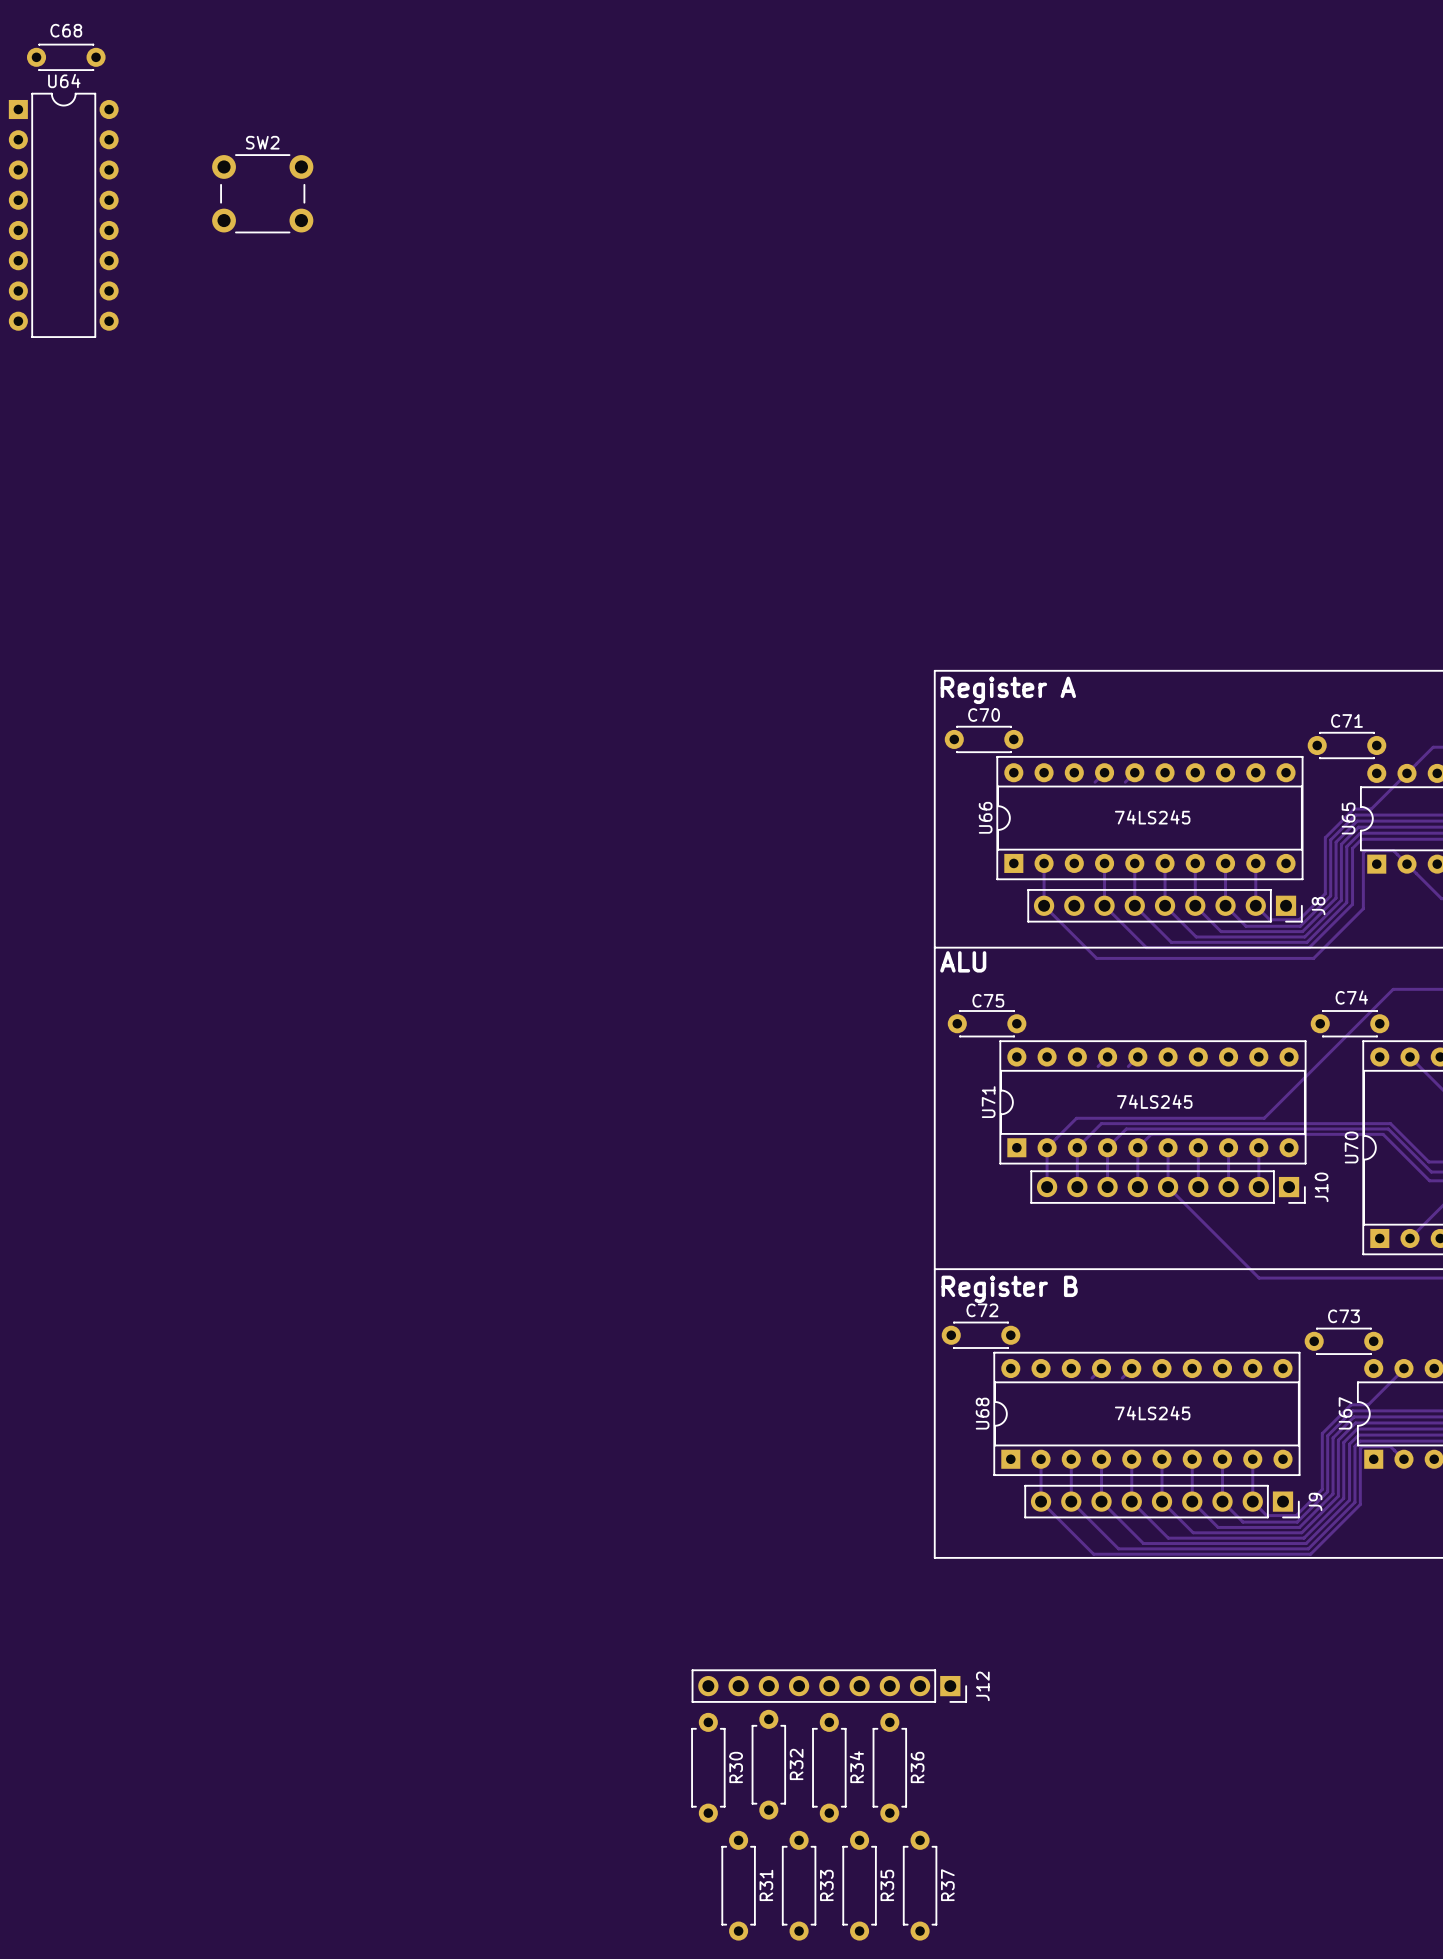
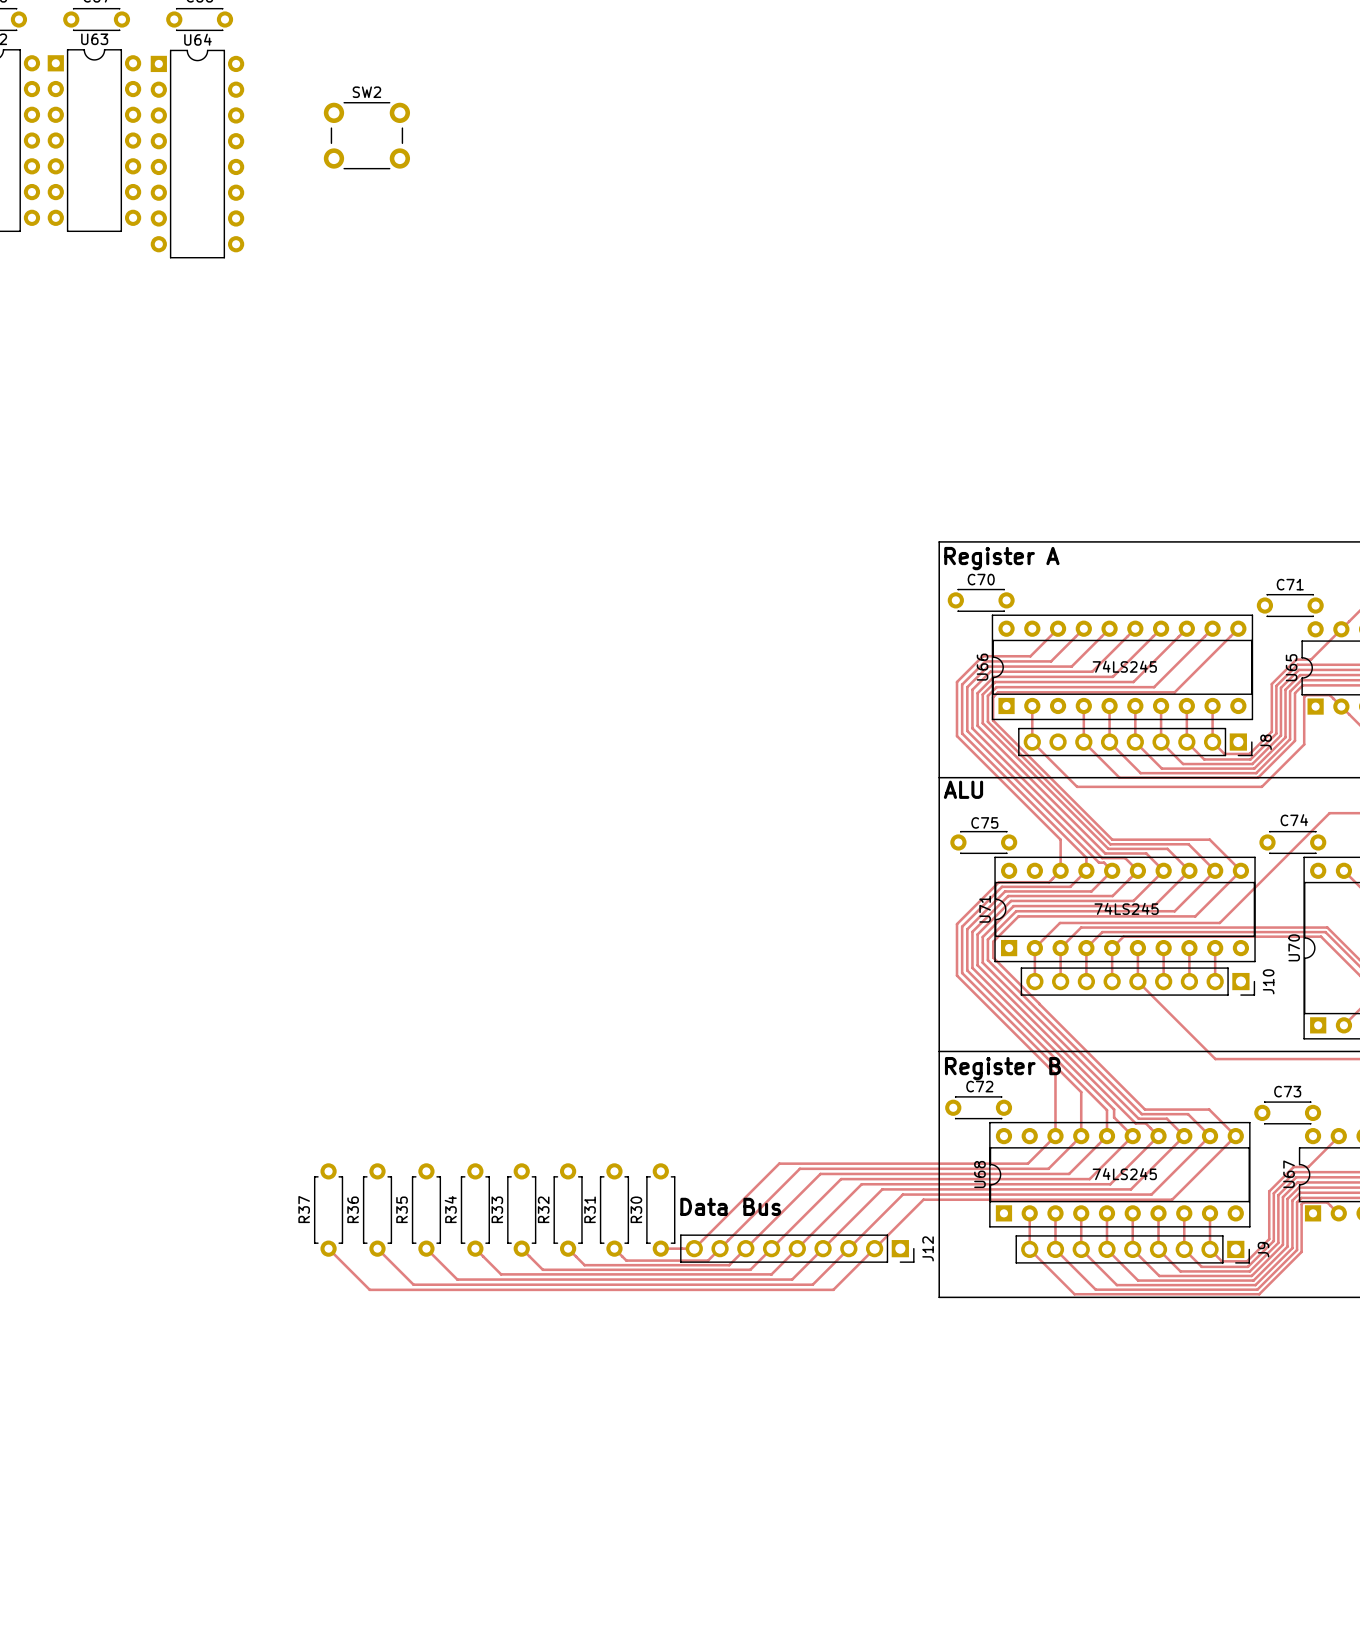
track: none -> (1058, 628) (1030, 656) (982, 656) (957, 682) (957, 736) (1060, 839) (1060, 870) (1049, 882) (998, 882) (957, 924) (957, 975) (1055, 1074) (1055, 1136) (1027, 1163) (779, 1163) (694, 1248) (660, 1248)
track: none -> (1135, 628) (1092, 671) (990, 671) (972, 689) (972, 728) (1102, 858) (1125, 858) (1137, 870) (1112, 896) (1008, 896) (972, 931) (972, 967) (1114, 1109) (1114, 1117) (1132, 1136) (1089, 1179) (841, 1179) (750, 1269) (542, 1269) (521, 1248)
track: none -> (1161, 628) (1112, 676) (993, 676) (977, 693) (977, 725) (1105, 853) (1146, 853) (1163, 870) (1133, 900) (1011, 900) (977, 934) (977, 965) (1135, 1123) (1145, 1123) (1158, 1136) (1110, 1184) (861, 1184) (771, 1274) (501, 1274) (475, 1248)
track: none -> (1186, 628) (1133, 682) (995, 682) (982, 694) (982, 723) (1108, 848) (1167, 848) (1189, 870) (1154, 906) (1013, 906) (982, 937) (982, 962) (1138, 1118) (1166, 1118) (1184, 1136) (1130, 1189) (882, 1189) (823, 1248)
track: none -> (1212, 628) (1154, 687) (996, 687) (987, 695) (987, 721) (1110, 844) (1188, 844) (1215, 870) (1174, 911) (1016, 911) (987, 939) (987, 960) (1141, 1114) (1188, 1114) (1210, 1136) (1151, 1194) (902, 1194) (812, 1284) (413, 1284) (377, 1248)
track: none -> (1238, 628) (1174, 692) (998, 692) (993, 697) (993, 720) (1112, 839) (1209, 839) (1240, 870) (1195, 916) (1018, 916) (993, 941) (993, 957) (1145, 1109) (1209, 1109) (1235, 1136) (1172, 1199) (923, 1199) (833, 1289) (369, 1289) (328, 1248)
track: none -> (1075, 636) (1051, 661) (985, 661) (962, 684) (962, 733) (1086, 857) (1086, 870)
track: none -> (1101, 636) (1071, 666) (987, 666) (967, 687) (967, 730) (1099, 862) (1104, 862) (1112, 870)
track: none -> (1078, 878) (1070, 886) (1002, 886) (962, 926) (962, 973) (1081, 1092) (1081, 1136)
track: none -> (1104, 878) (1091, 891) (1005, 891) (967, 929) (967, 970) (1106, 1110) (1106, 1136)
track: none -> (1073, 1144) (1048, 1168) (799, 1168) (708, 1260) (626, 1260) (614, 1248)
track: none -> (1098, 1144) (1069, 1173) (820, 1173) (729, 1265) (584, 1265) (568, 1248)
text: none -> Data Bus (730, 1206)
track: none -> (426, 1248) (457, 1279) (792, 1279) (820, 1251)
J12 position: (829, 1686) -> (797, 1248)
R32 position: (768, 1764) -> (568, 1210)
R32 name position: R32 (796, 1764) -> R32 (543, 1209)
R30 position: (708, 1767) -> (660, 1210)
R30 name position: R30 (736, 1767) -> R30 (636, 1209)
R34 position: (829, 1767) -> (475, 1210)
R34 name position: R34 (856, 1767) -> R34 (450, 1209)
R36 position: (889, 1767) -> (377, 1210)
R36 name position: R36 (917, 1767) -> R36 (353, 1209)
R31 position: (738, 1885) -> (614, 1210)
R31 name position: R31 (766, 1885) -> R31 (590, 1209)
R33 position: (799, 1885) -> (521, 1210)
R33 name position: R33 (826, 1885) -> R33 (497, 1209)
R35 position: (859, 1885) -> (426, 1210)
R35 name position: R35 (887, 1885) -> R35 (402, 1209)
R37 position: (920, 1885) -> (328, 1210)
R37 name position: R37 (947, 1885) -> R37 (304, 1209)

